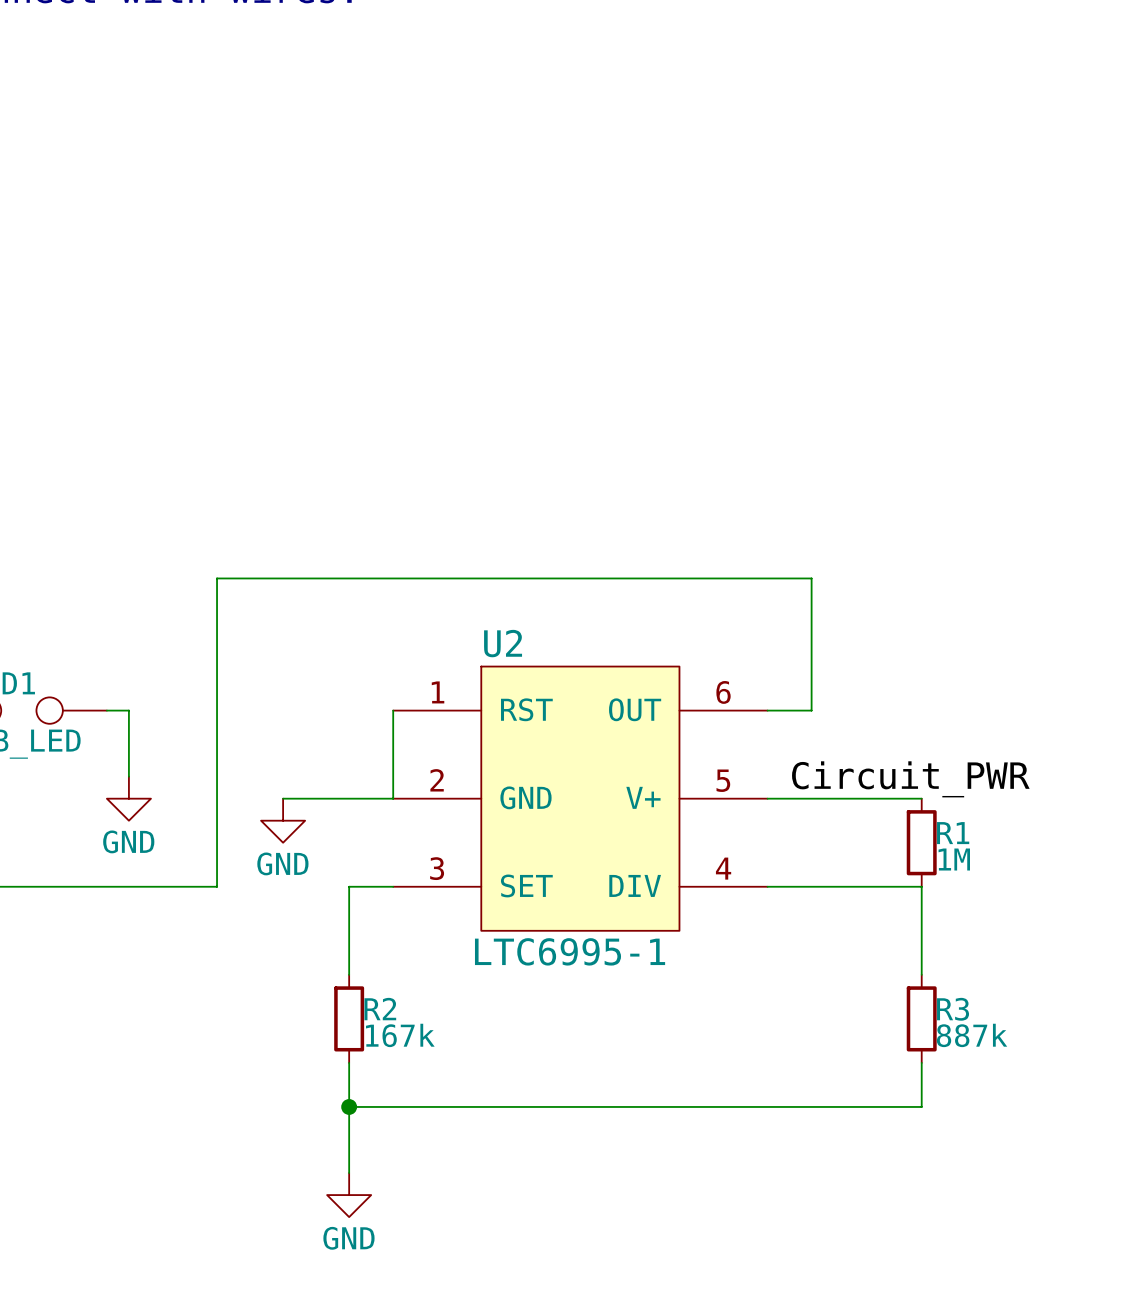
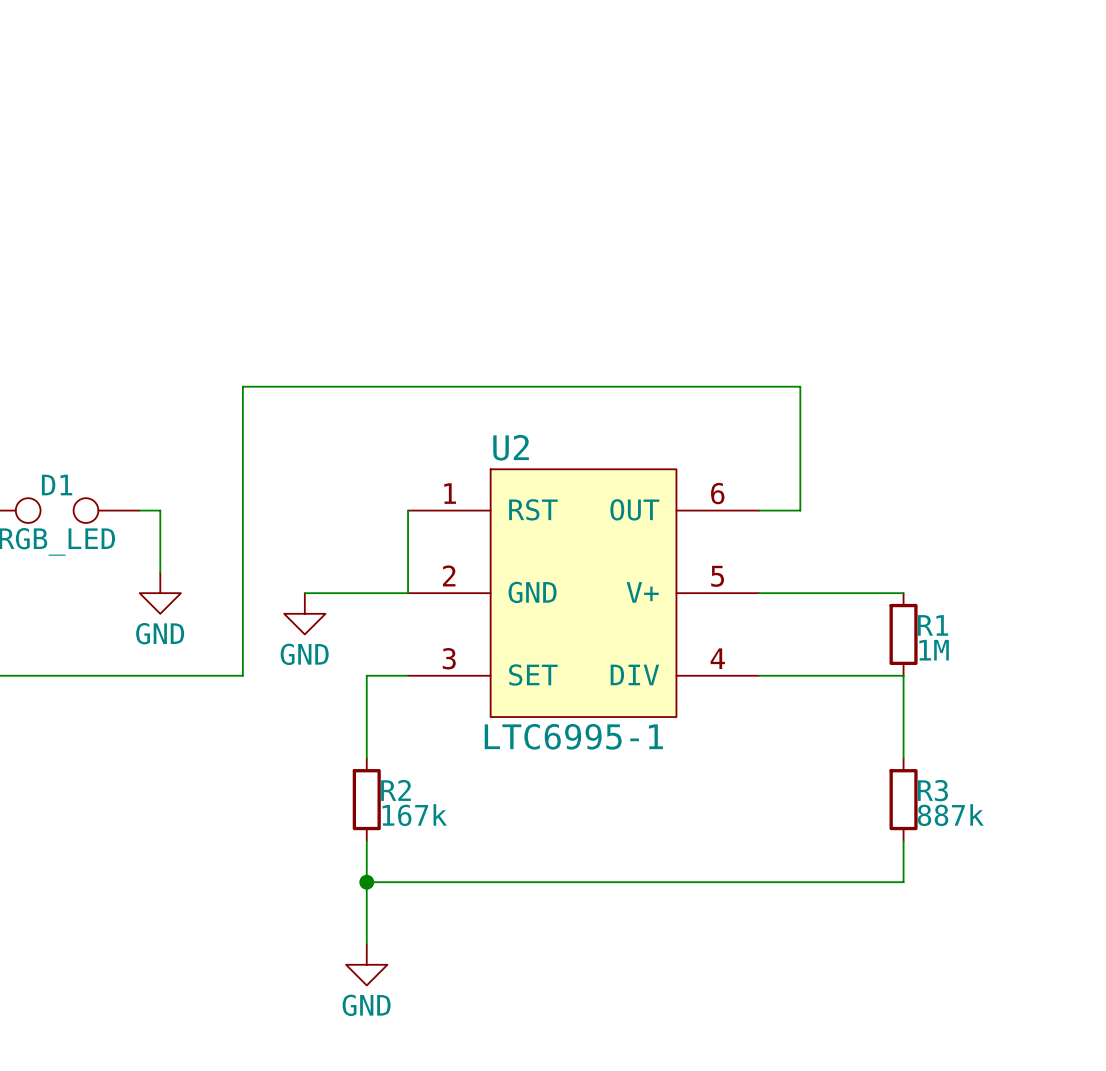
label: Circuit_PWR (910, 779) -> none

